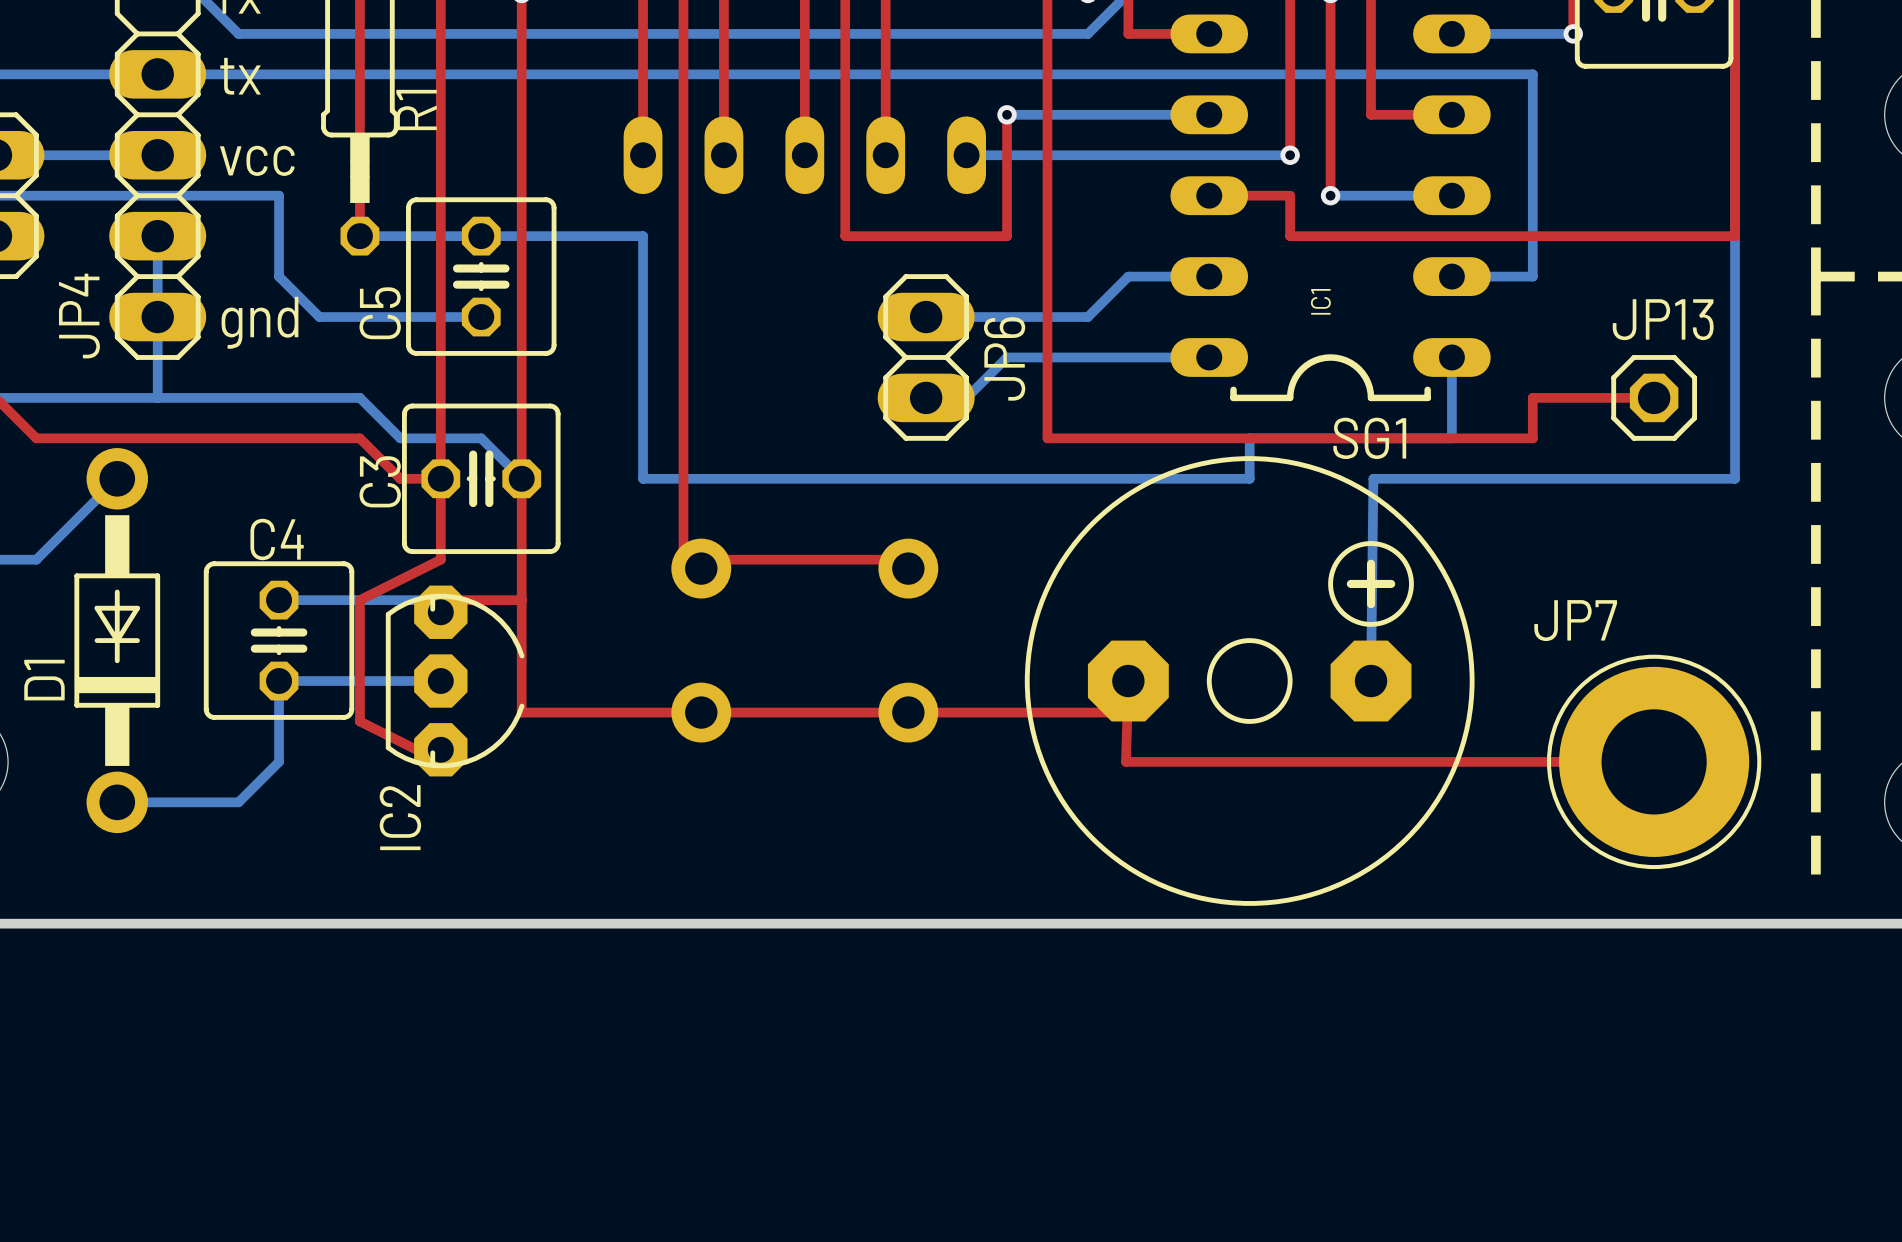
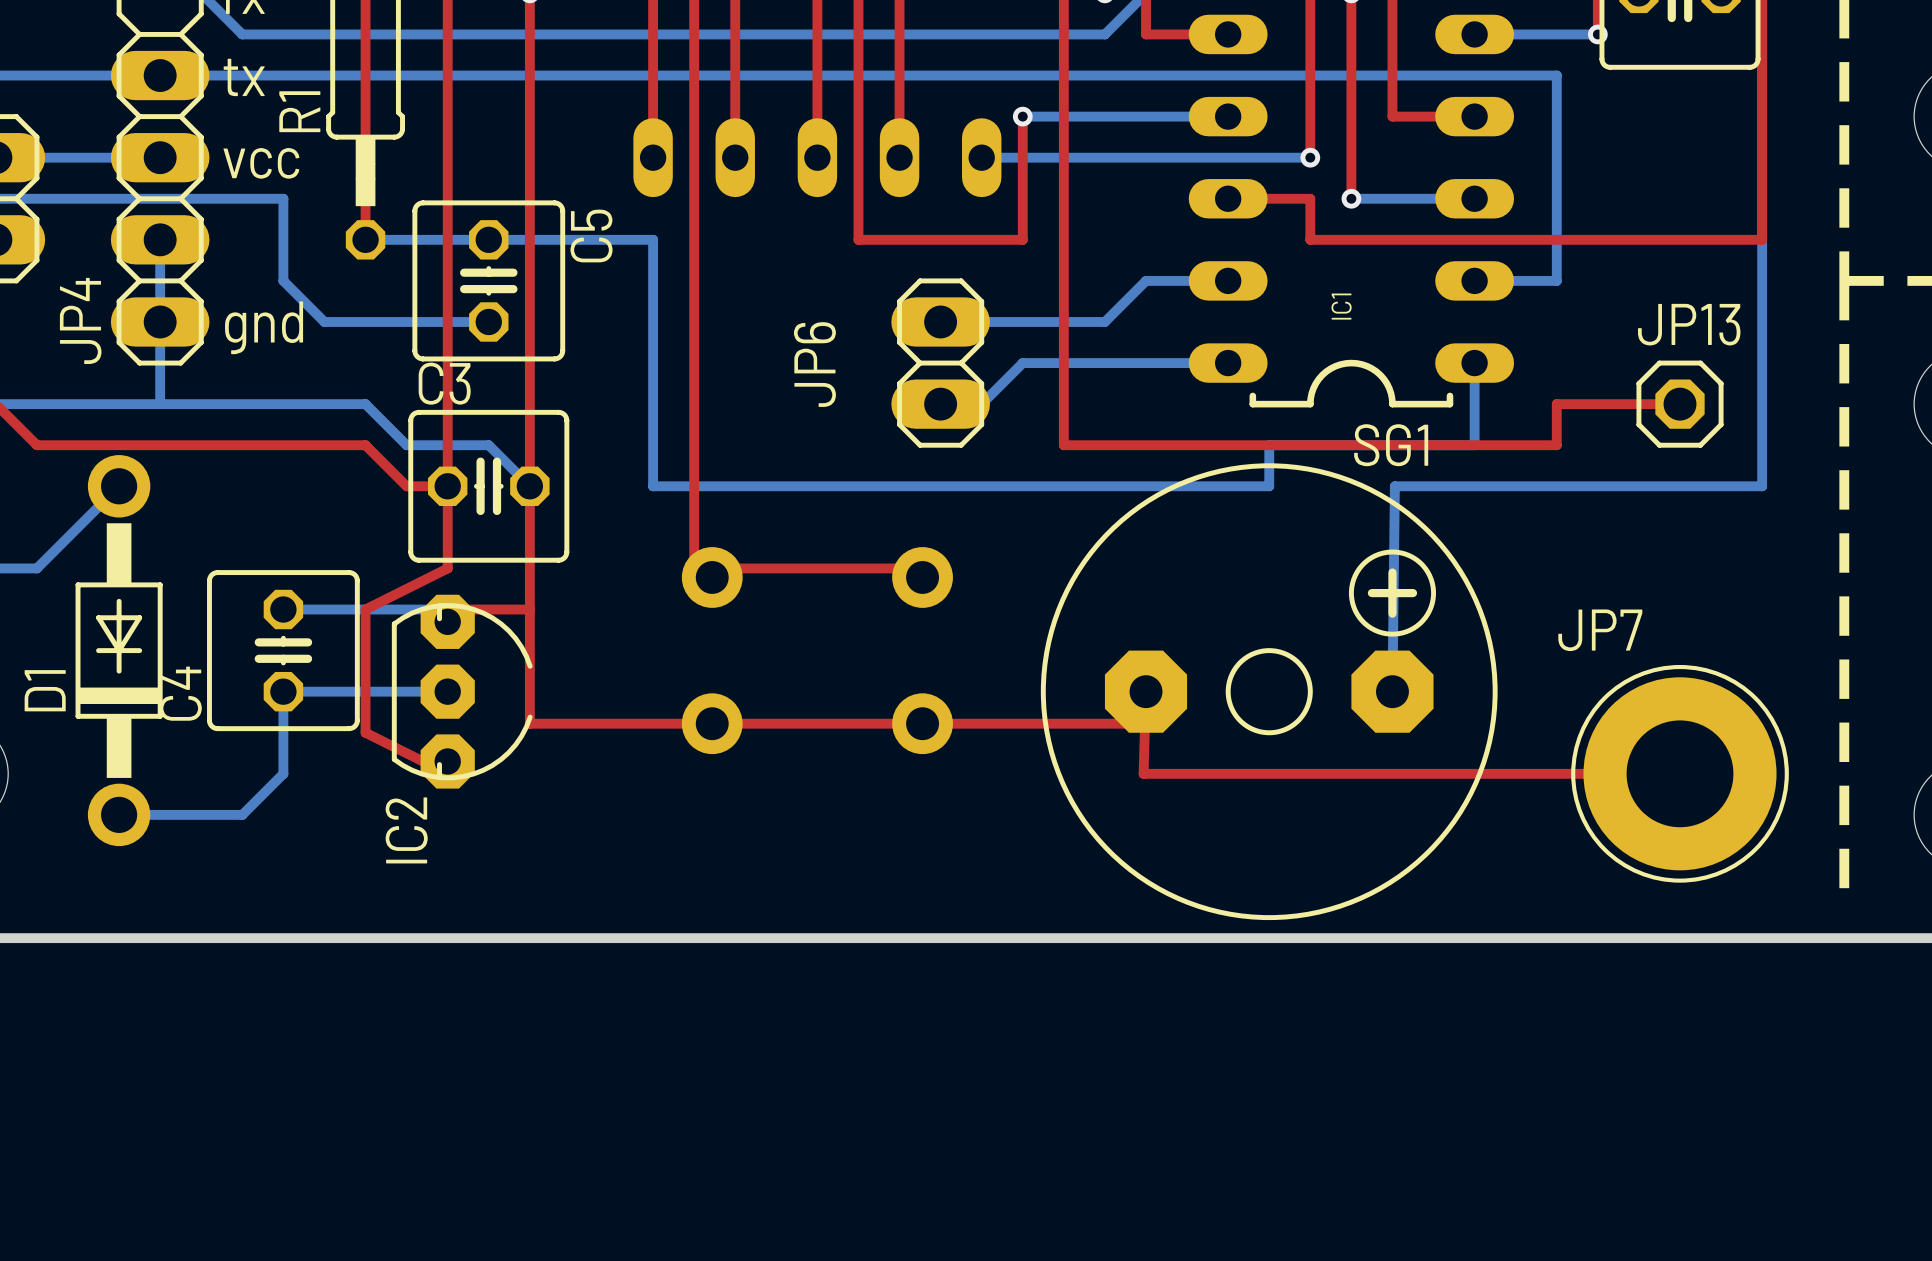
R1 name position: R1 (416, 109) -> R1 (299, 111)
C5 name position: C5 (380, 313) -> C5 (591, 235)
JP6 name position: JP6 (1004, 358) -> JP6 (814, 364)
C3 name rotation: 0° (380, 481) -> 90° clockwise (444, 383)
C3 name position: C3 (380, 481) -> C3 (444, 383)
C4 name rotation: 0° (277, 539) -> 90° counterclockwise (180, 693)
C4 name position: C4 (277, 539) -> C4 (180, 693)

